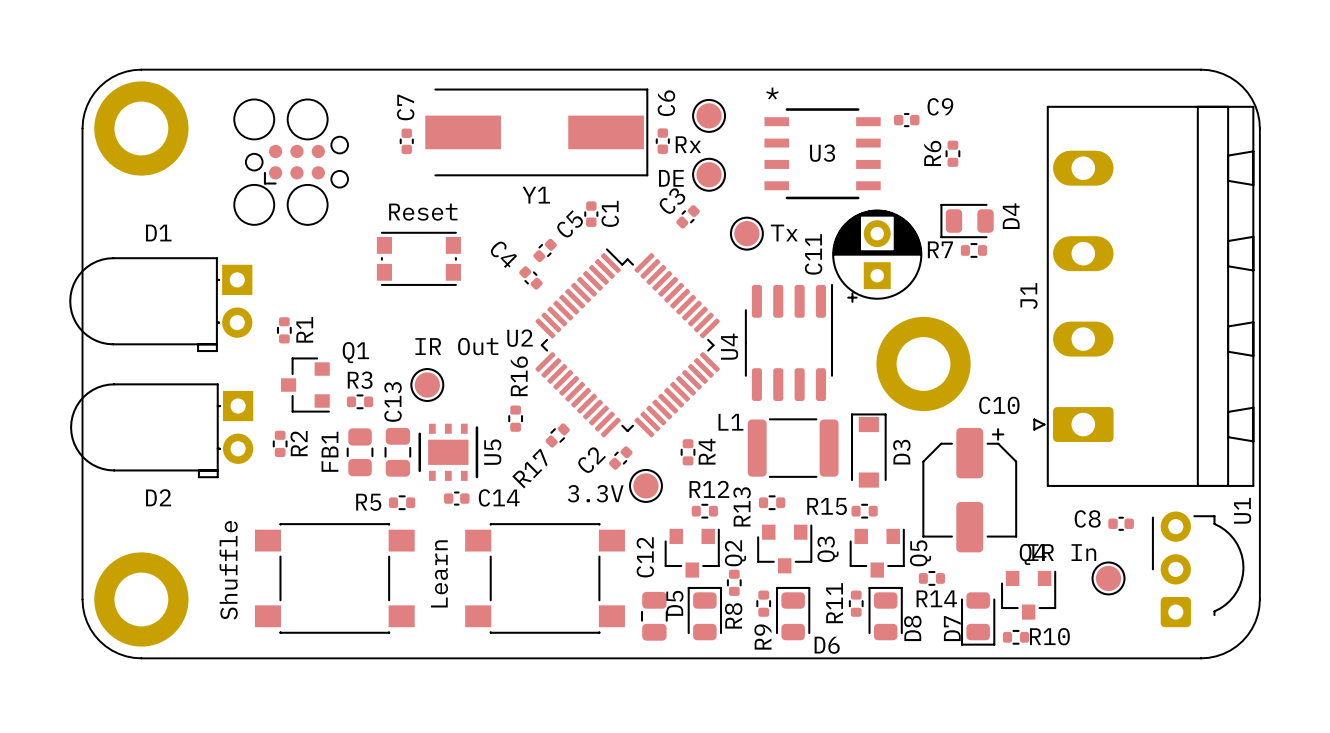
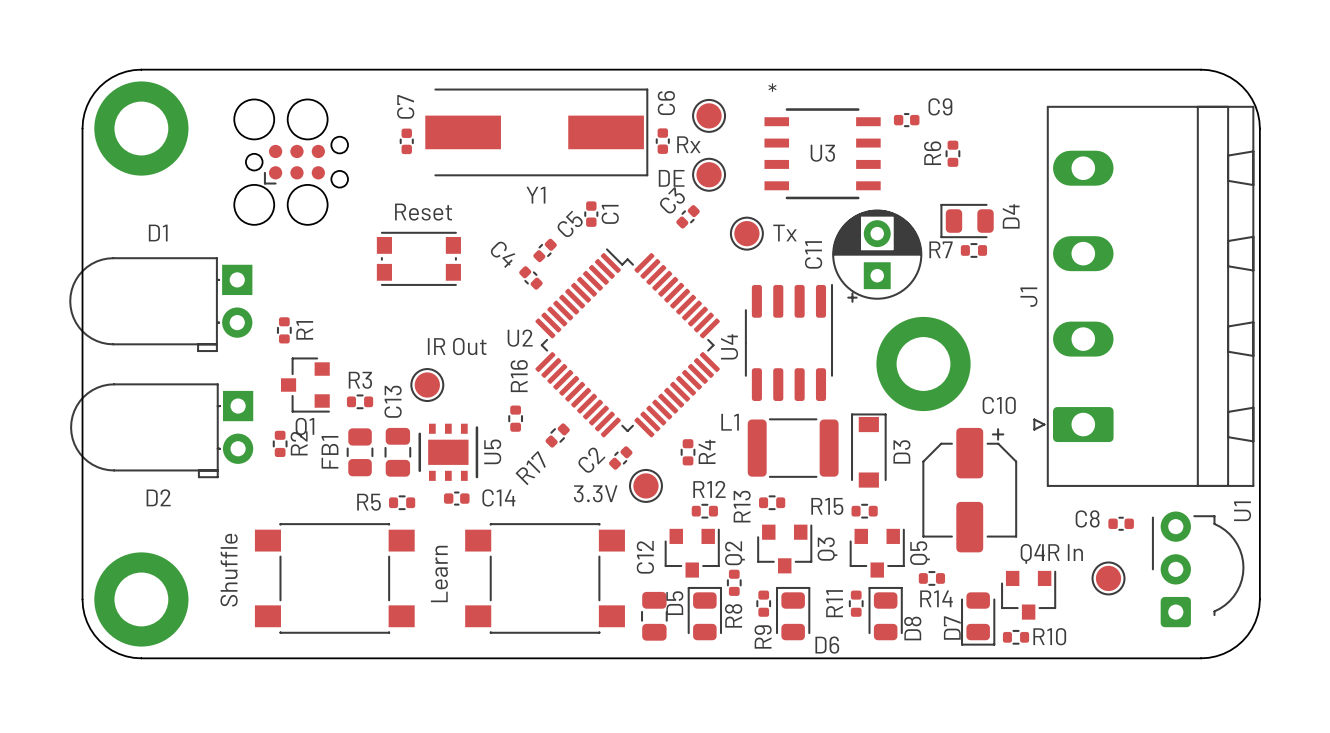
Q1 name position: Q1 (355, 352) -> Q1 (304, 427)

